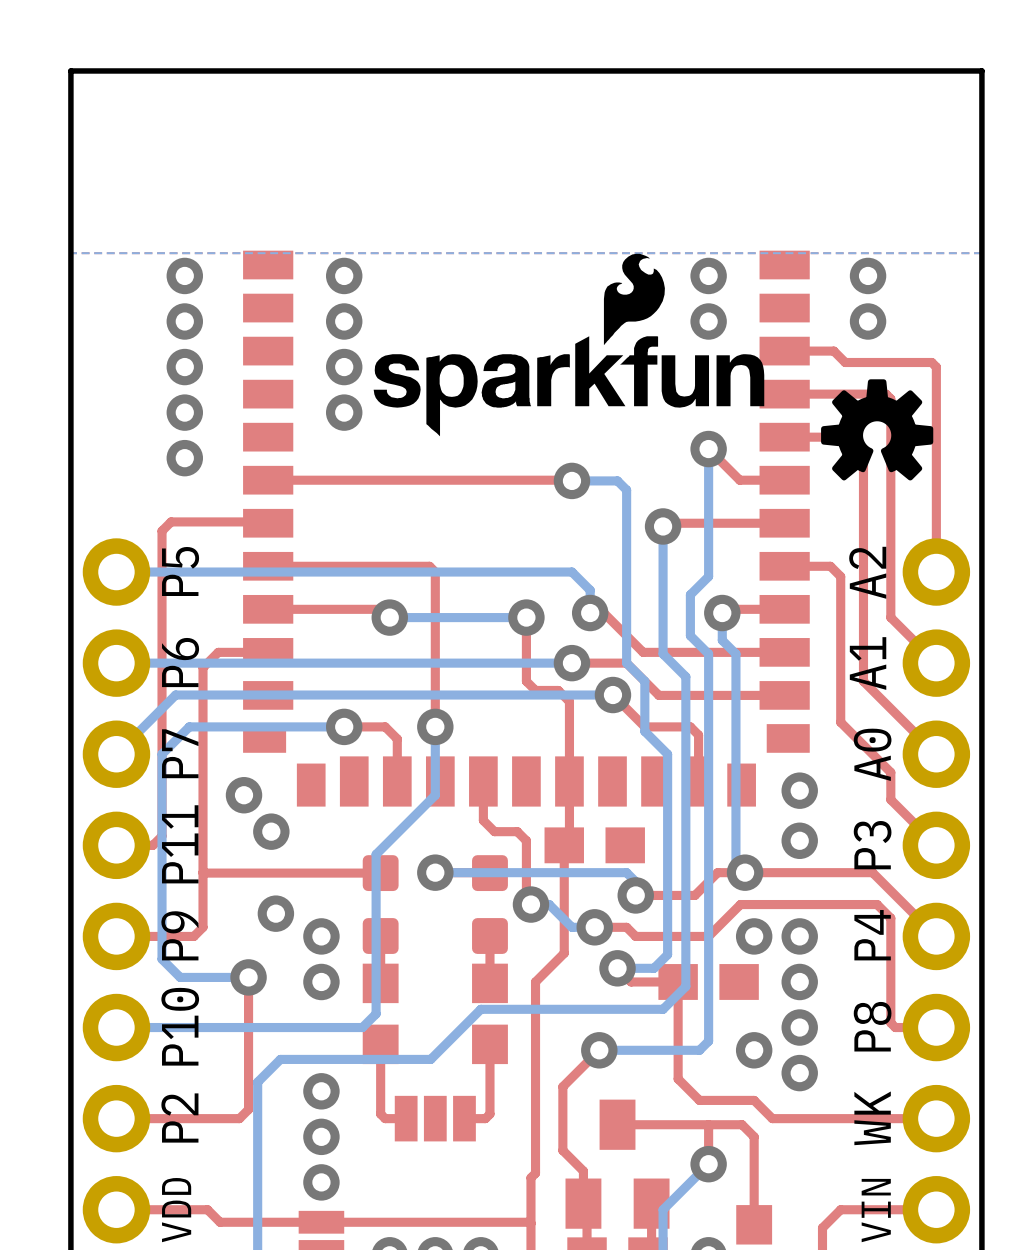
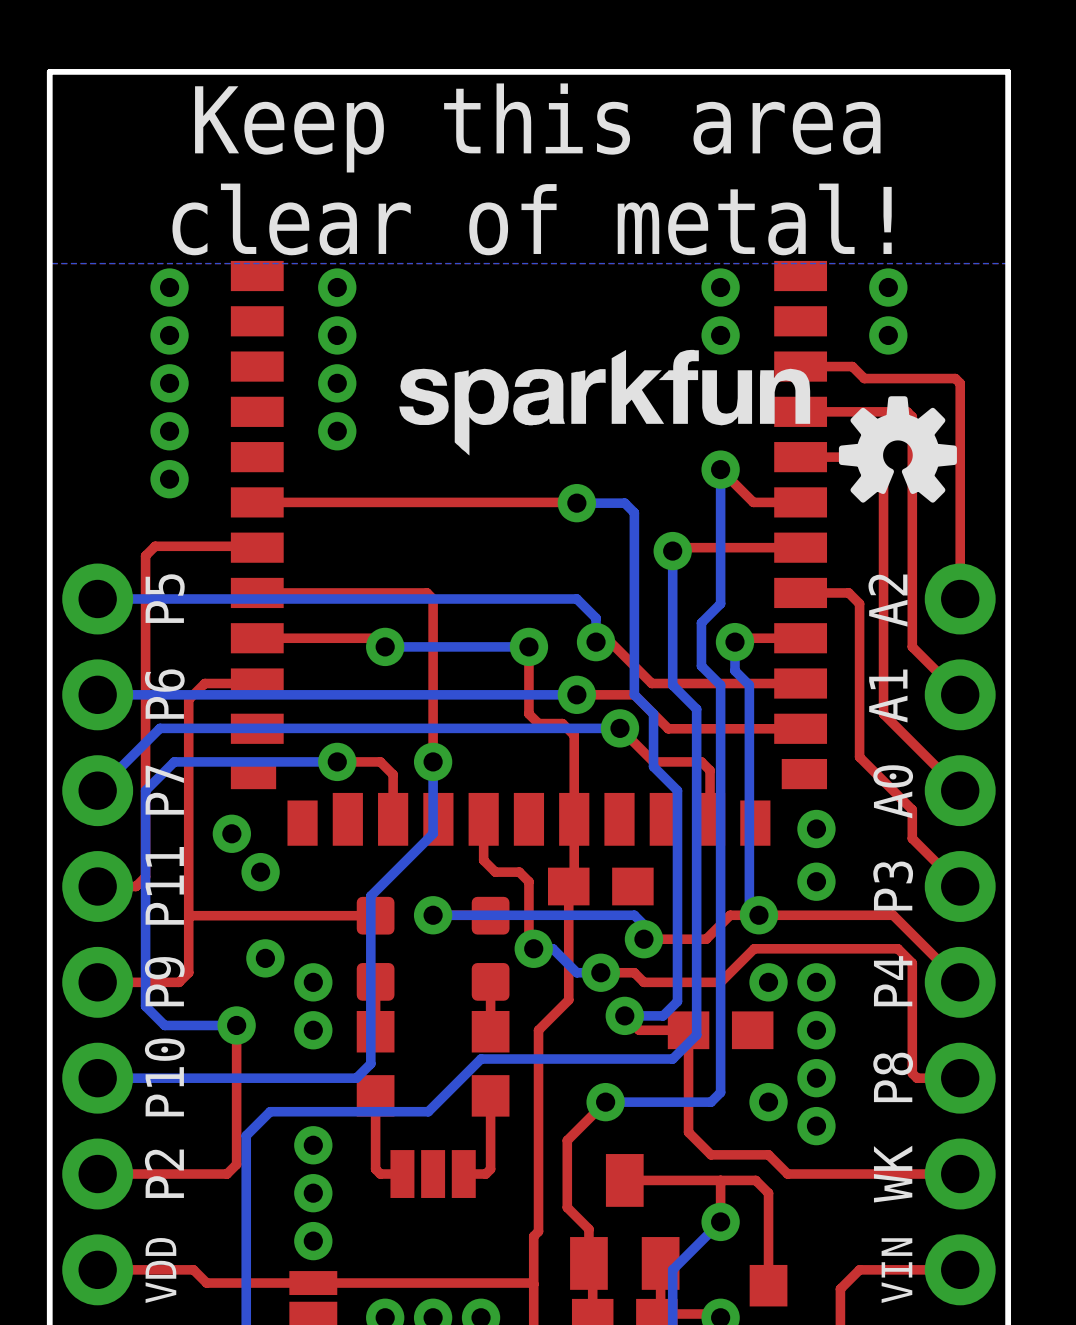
text: none -> Keep this area (537, 127)
text: none -> clear of metal! (532, 219)
drawing: [373, 253, 765, 437] -> none
drawing: none -> [399, 349, 811, 456]

